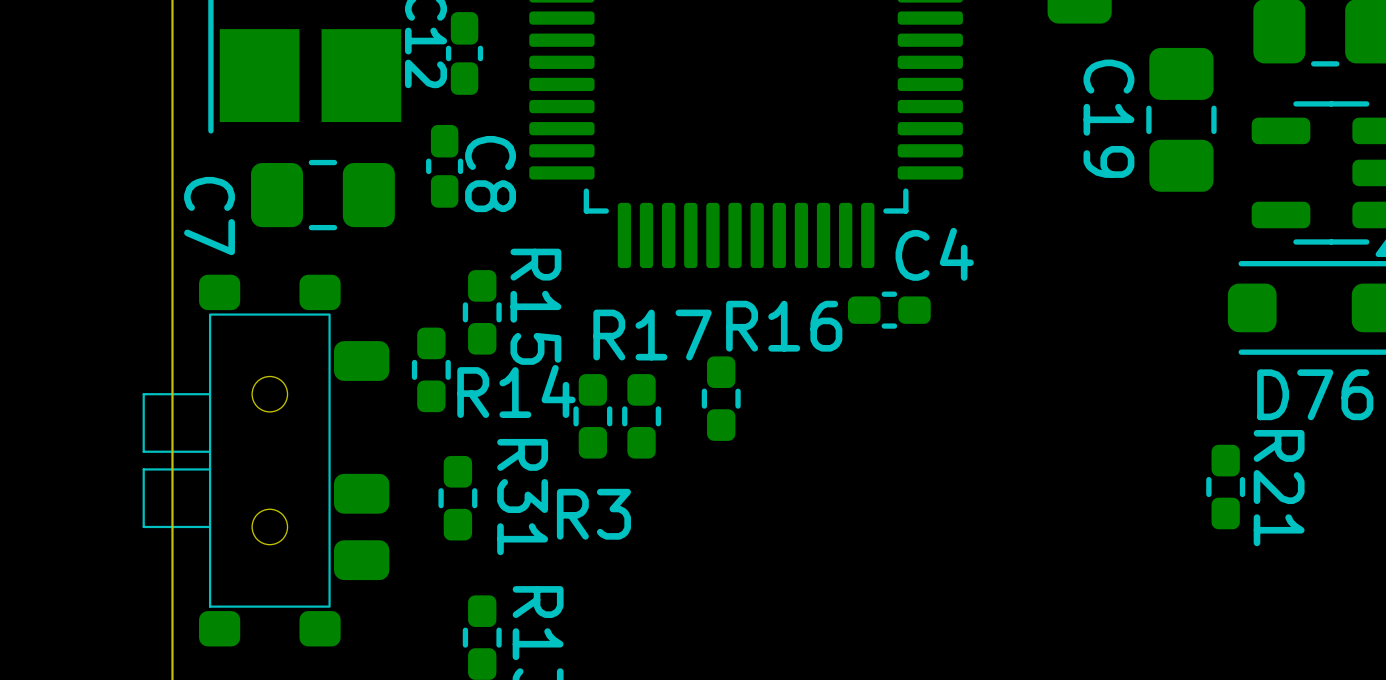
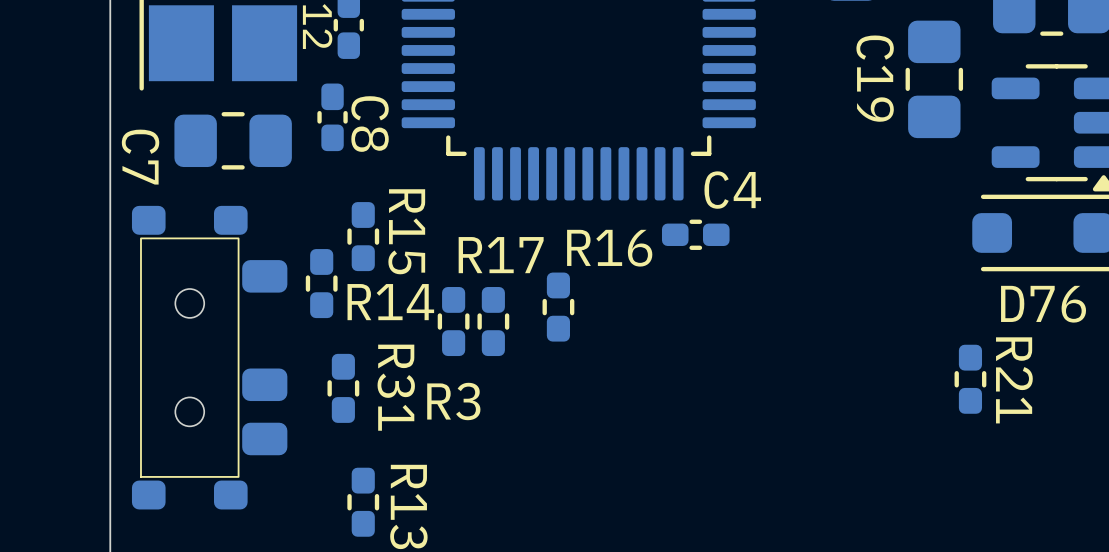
part footprint: [142, 274, 390, 647] -> [131, 205, 288, 510]

